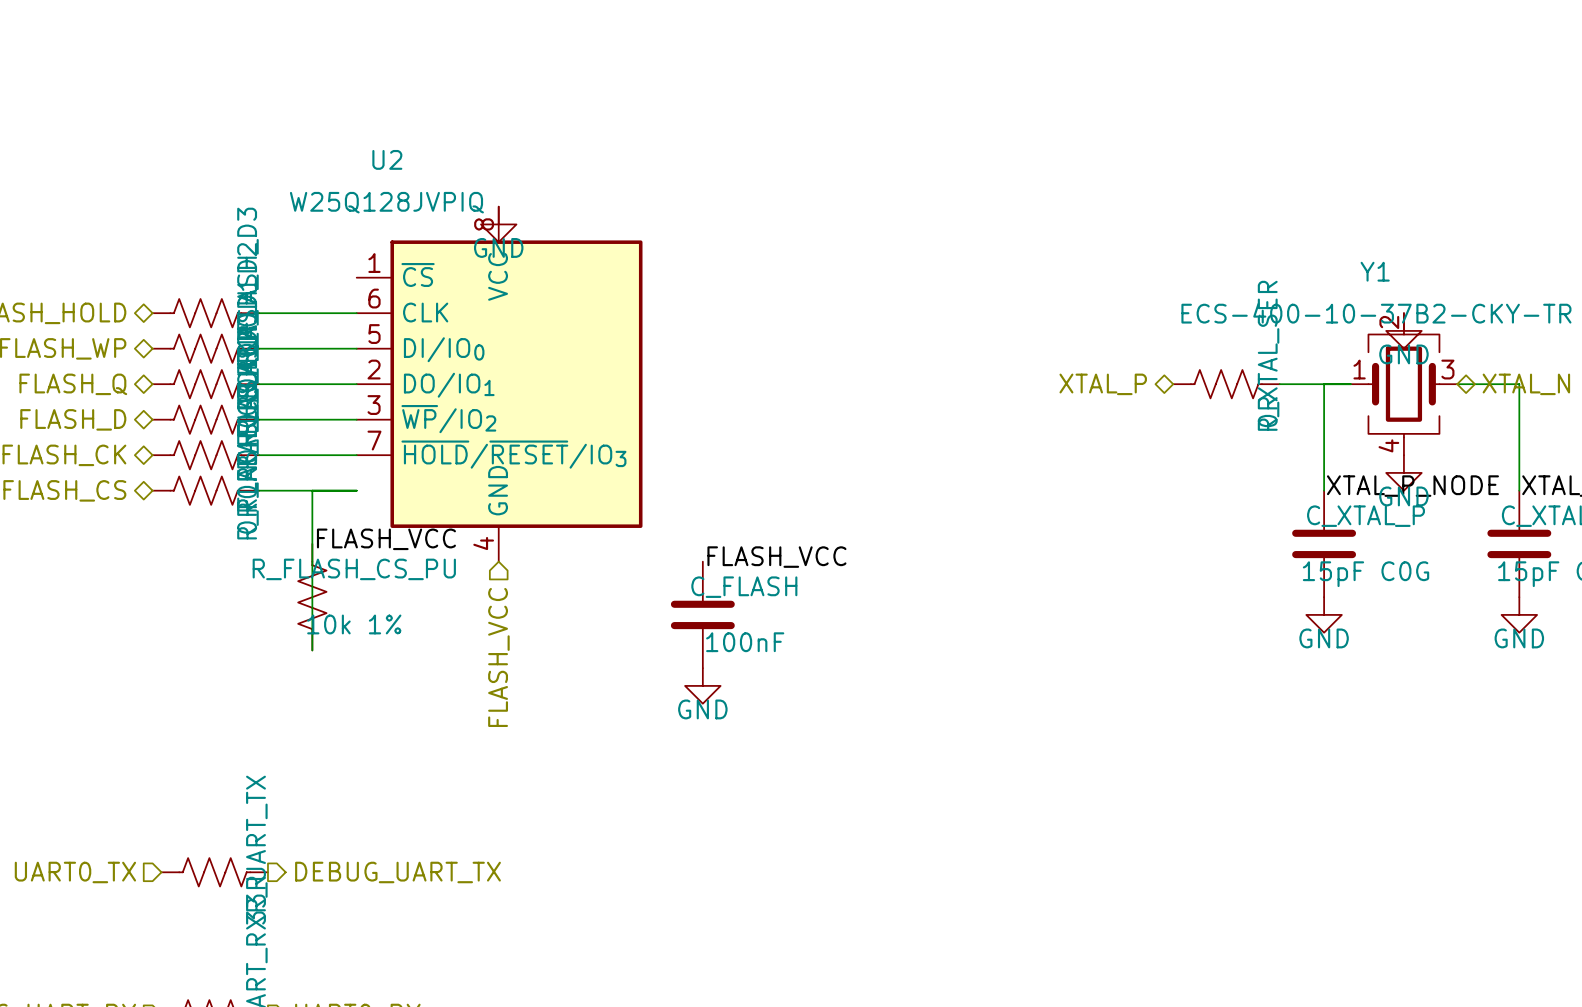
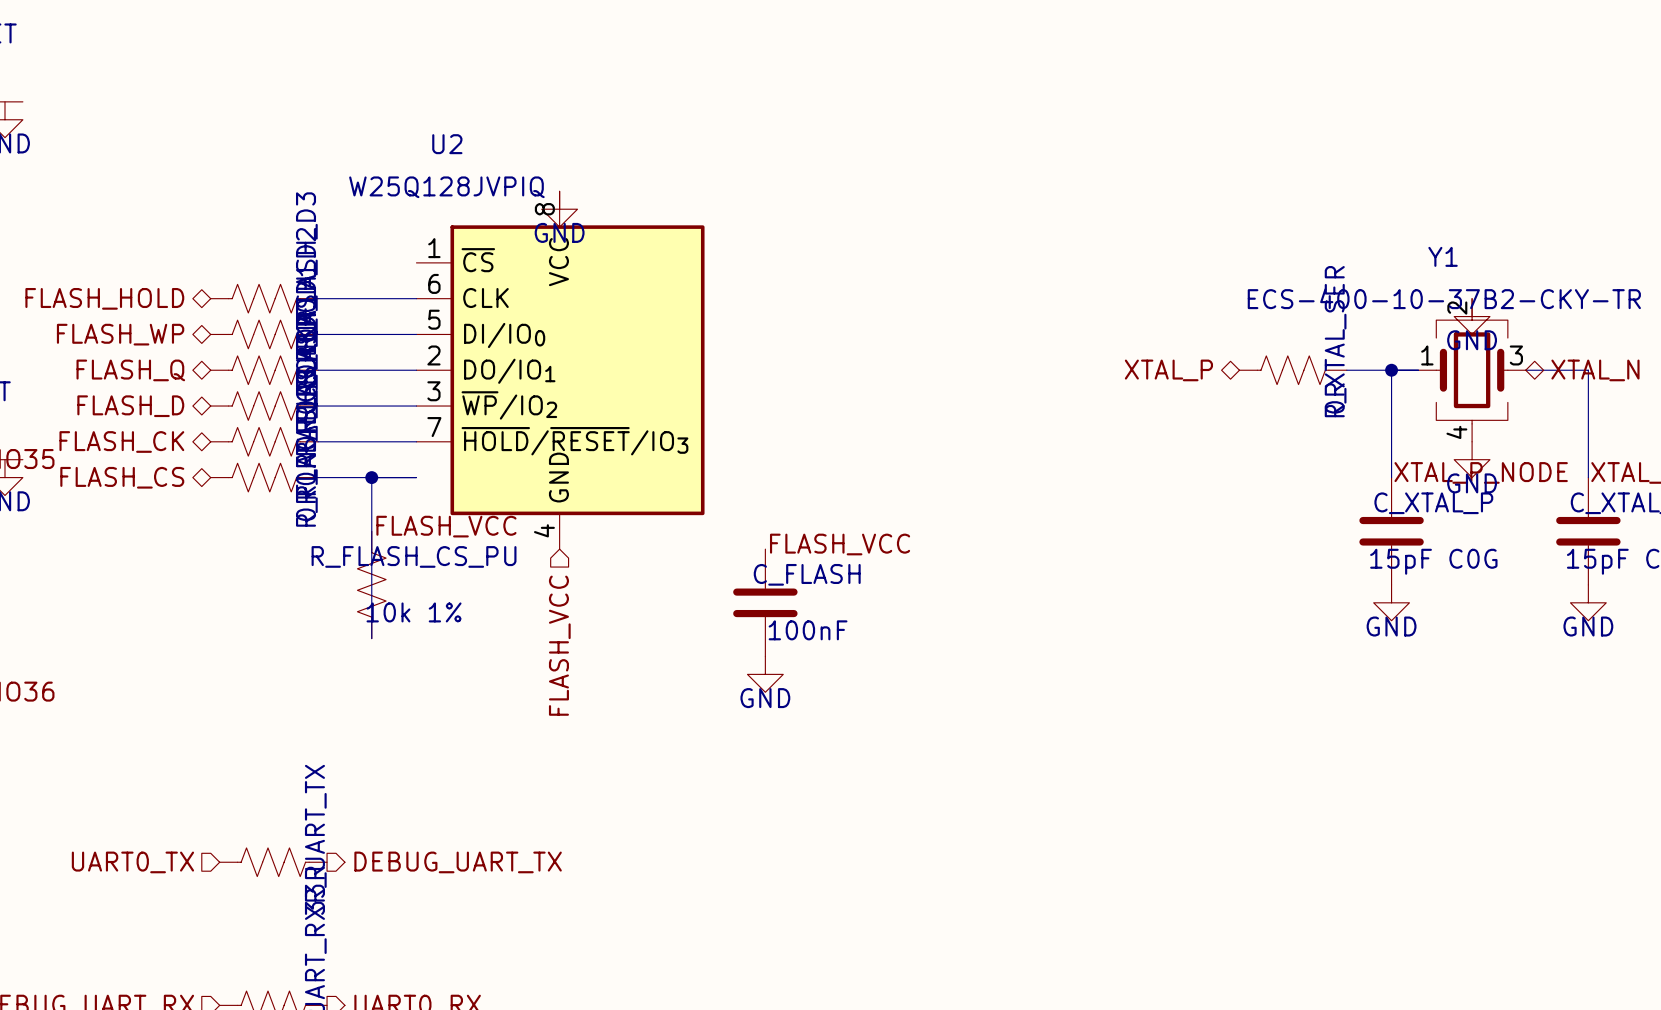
junction: none -> (1391, 370)
junction: none -> (371, 477)

